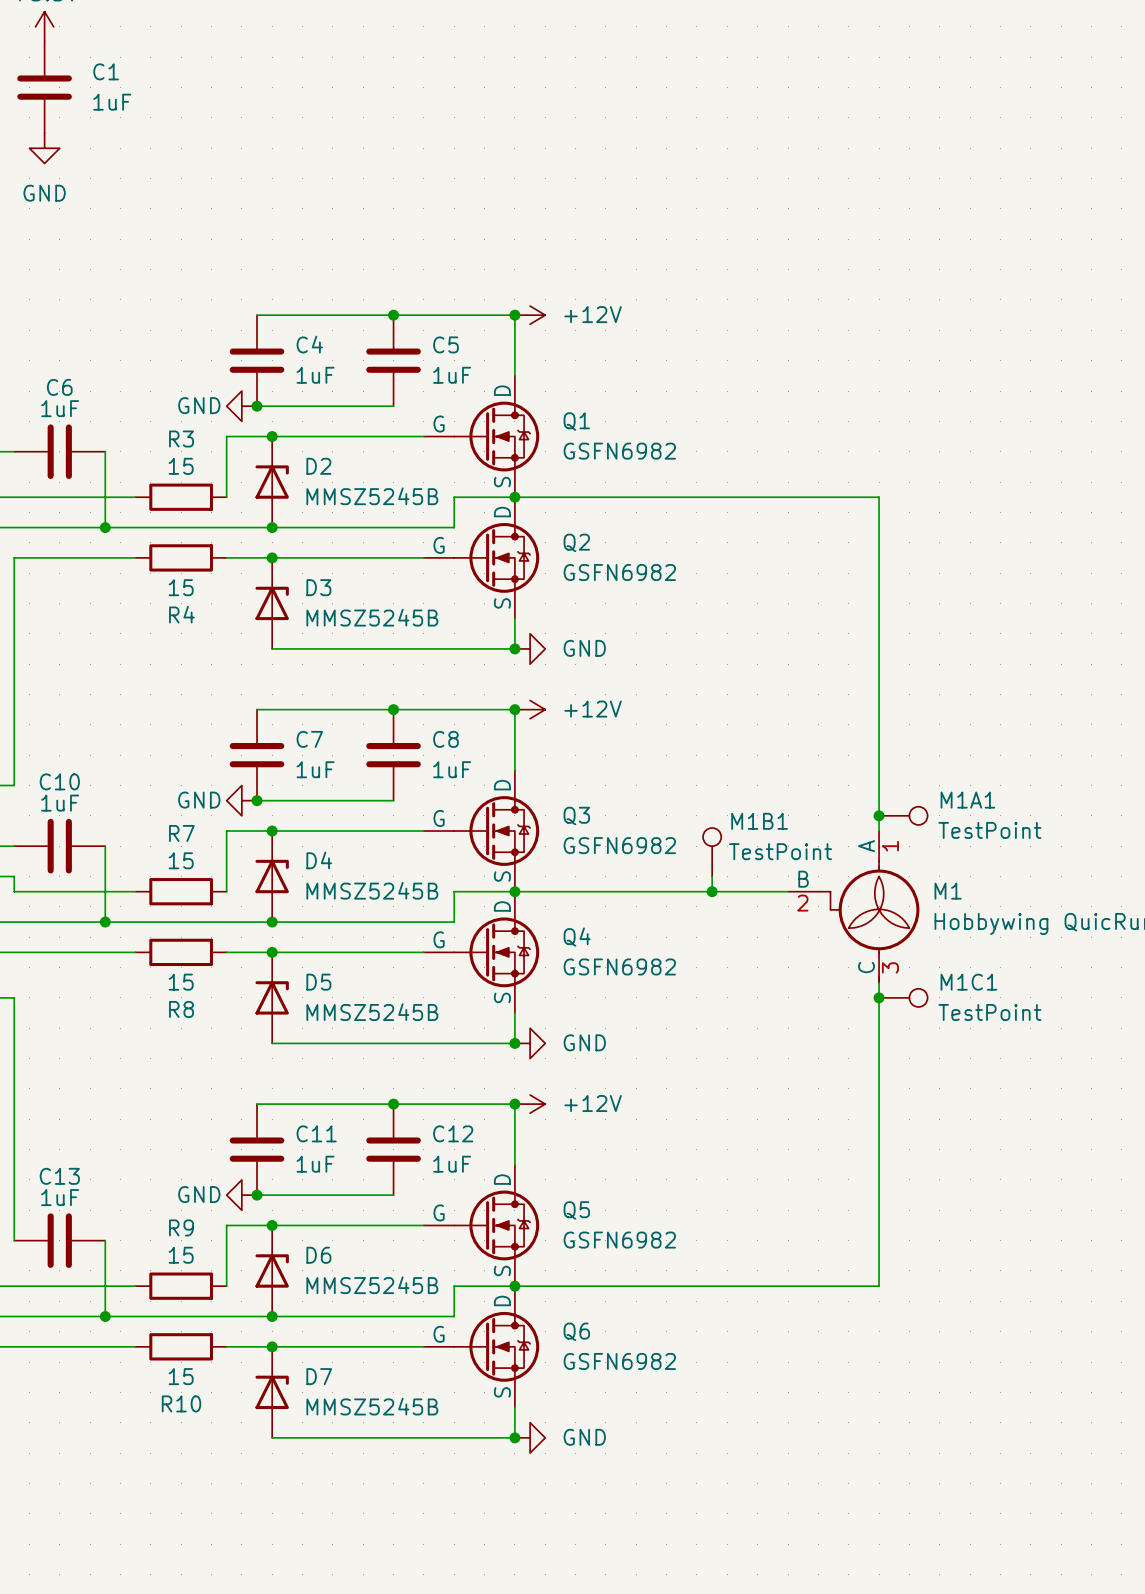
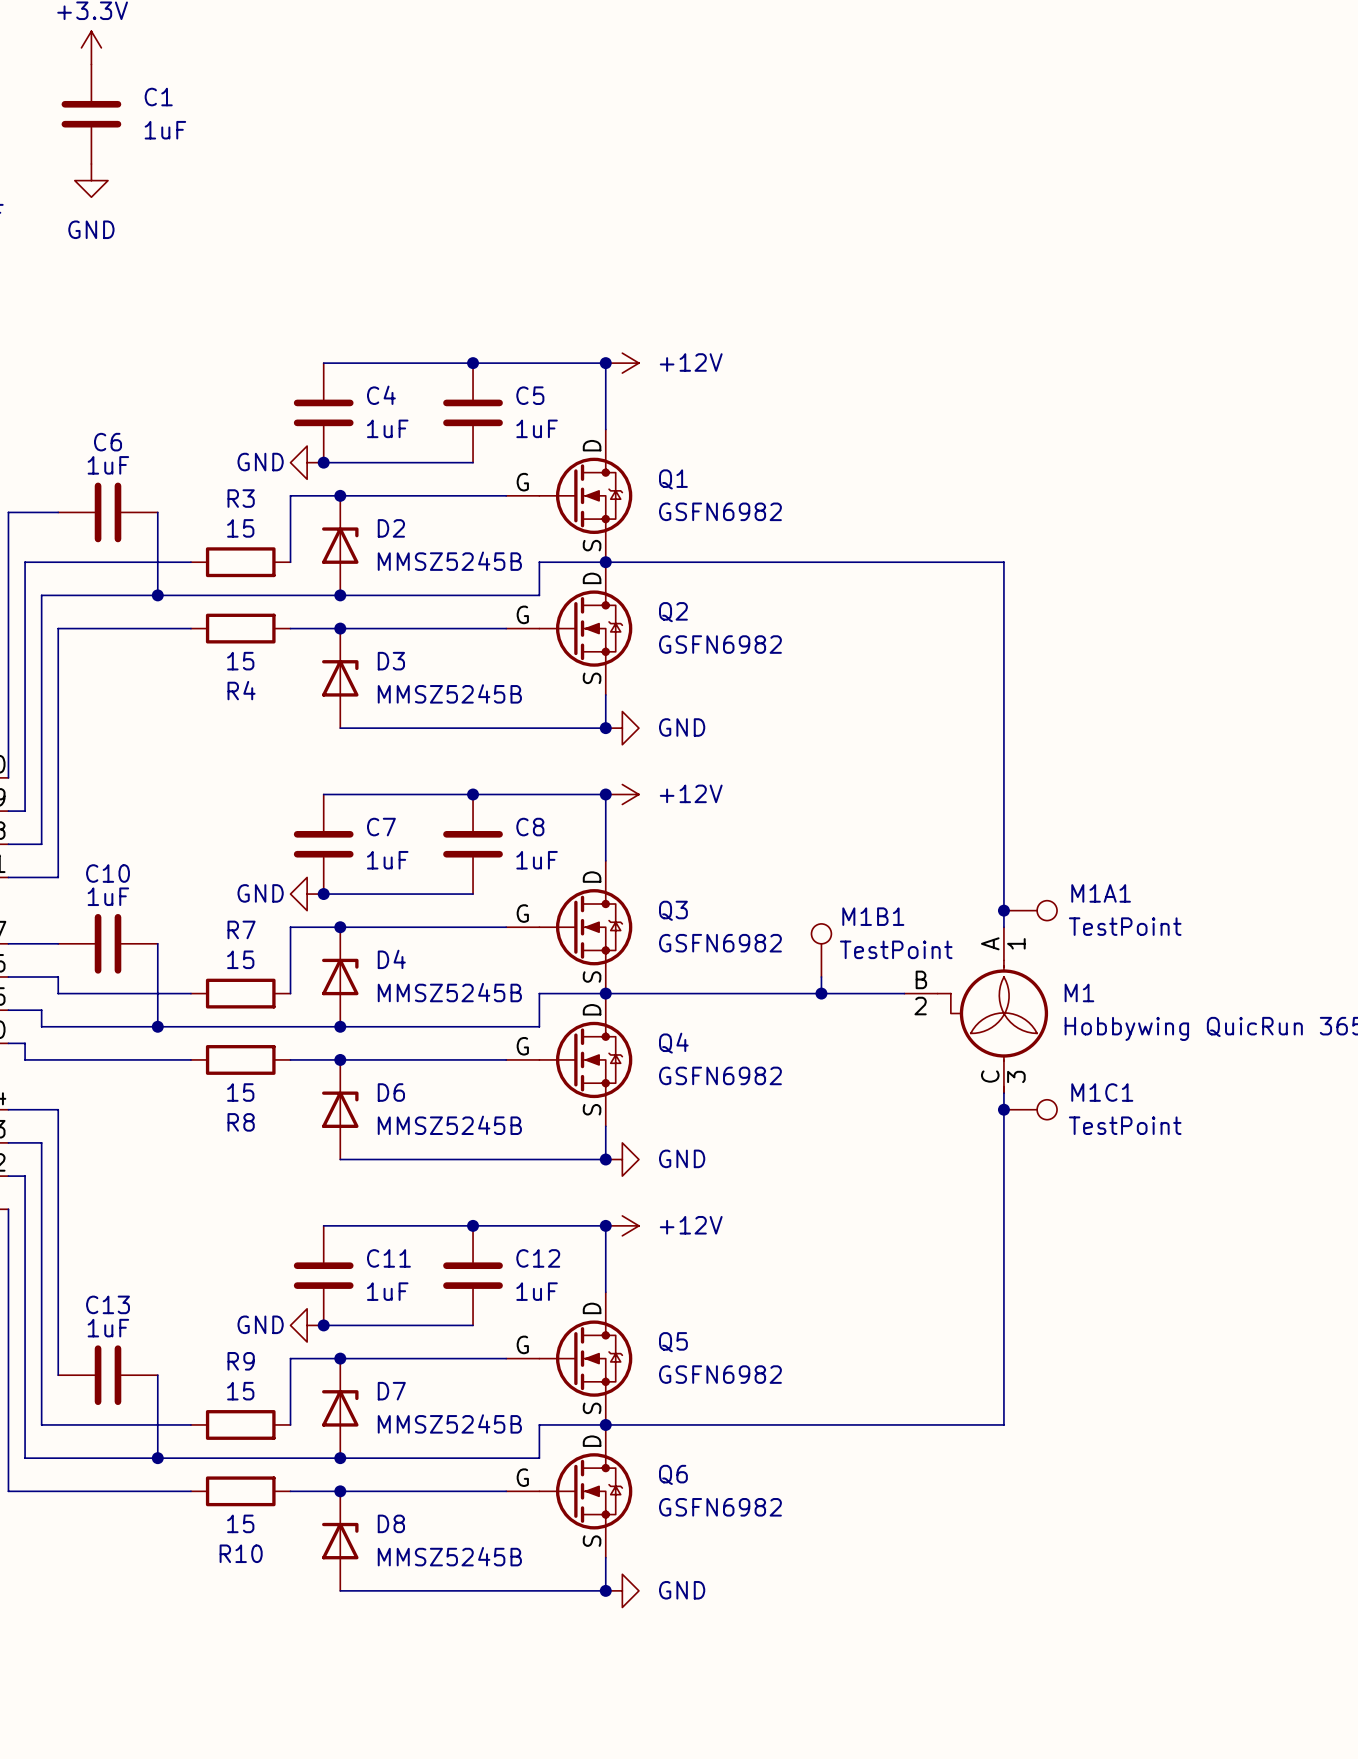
D5 name: D5 (318, 982) -> D6 (391, 1092)
D6 name: D6 (318, 1255) -> D7 (391, 1391)
D7 name: D7 (319, 1376) -> D8 (391, 1523)

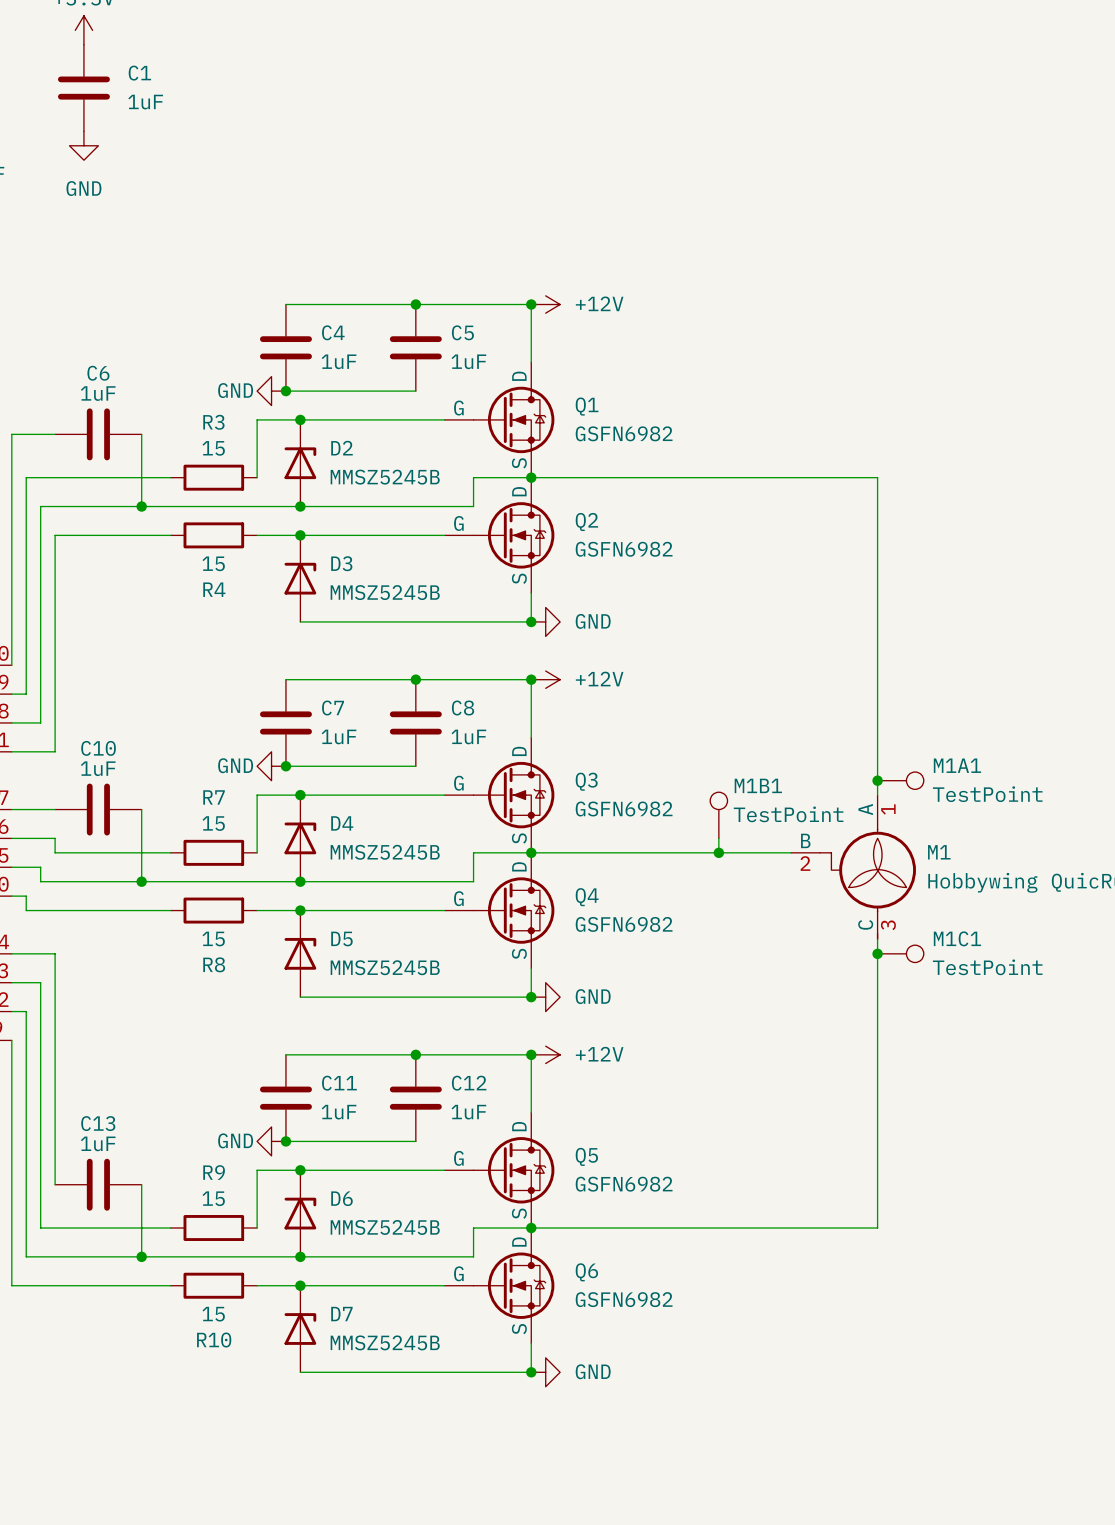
D6 name: D6 (391, 1092) -> D5 (341, 938)
D7 name: D7 (391, 1391) -> D6 (341, 1198)
D8 name: D8 (391, 1523) -> D7 (341, 1314)

